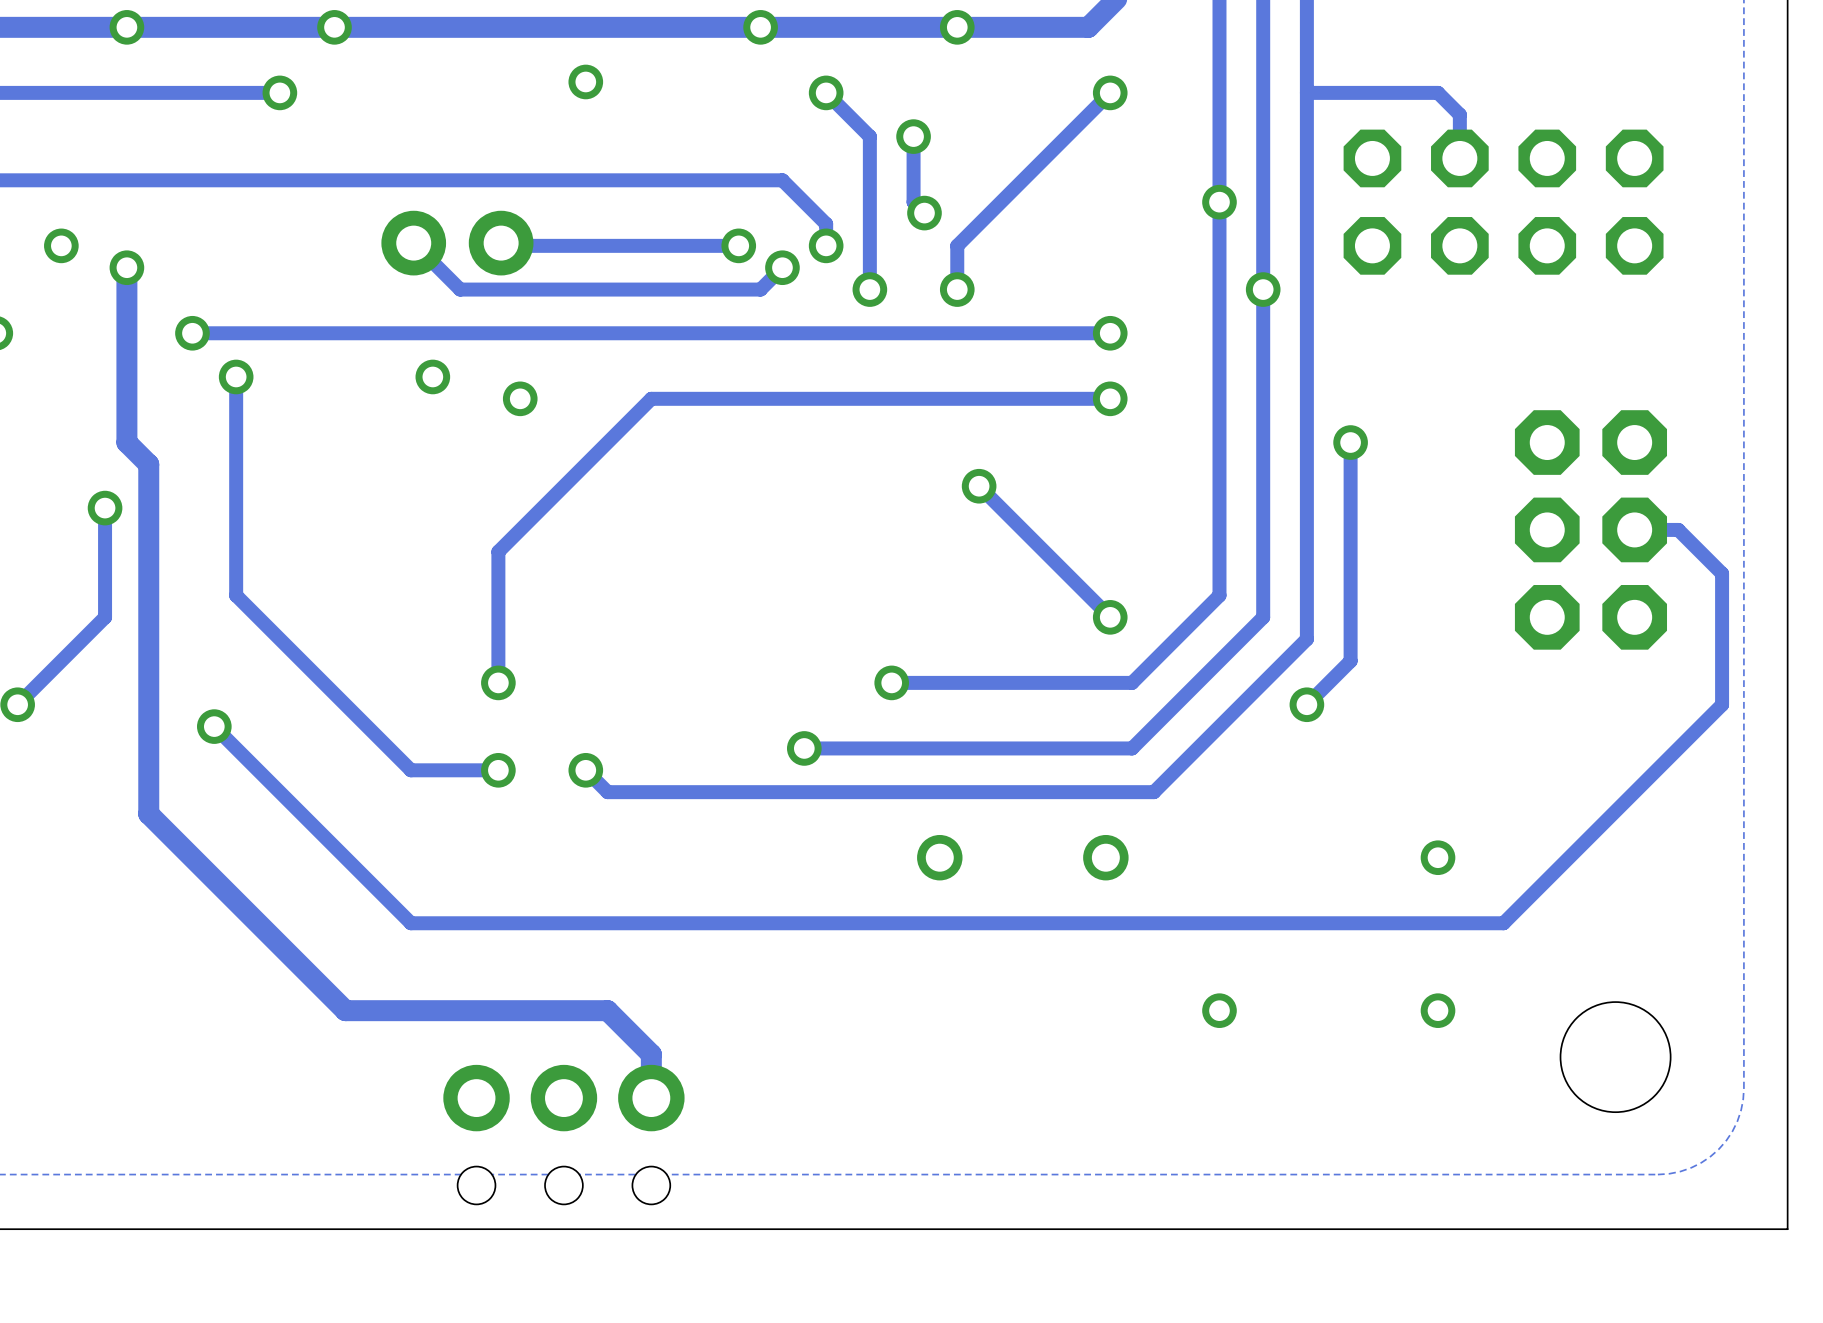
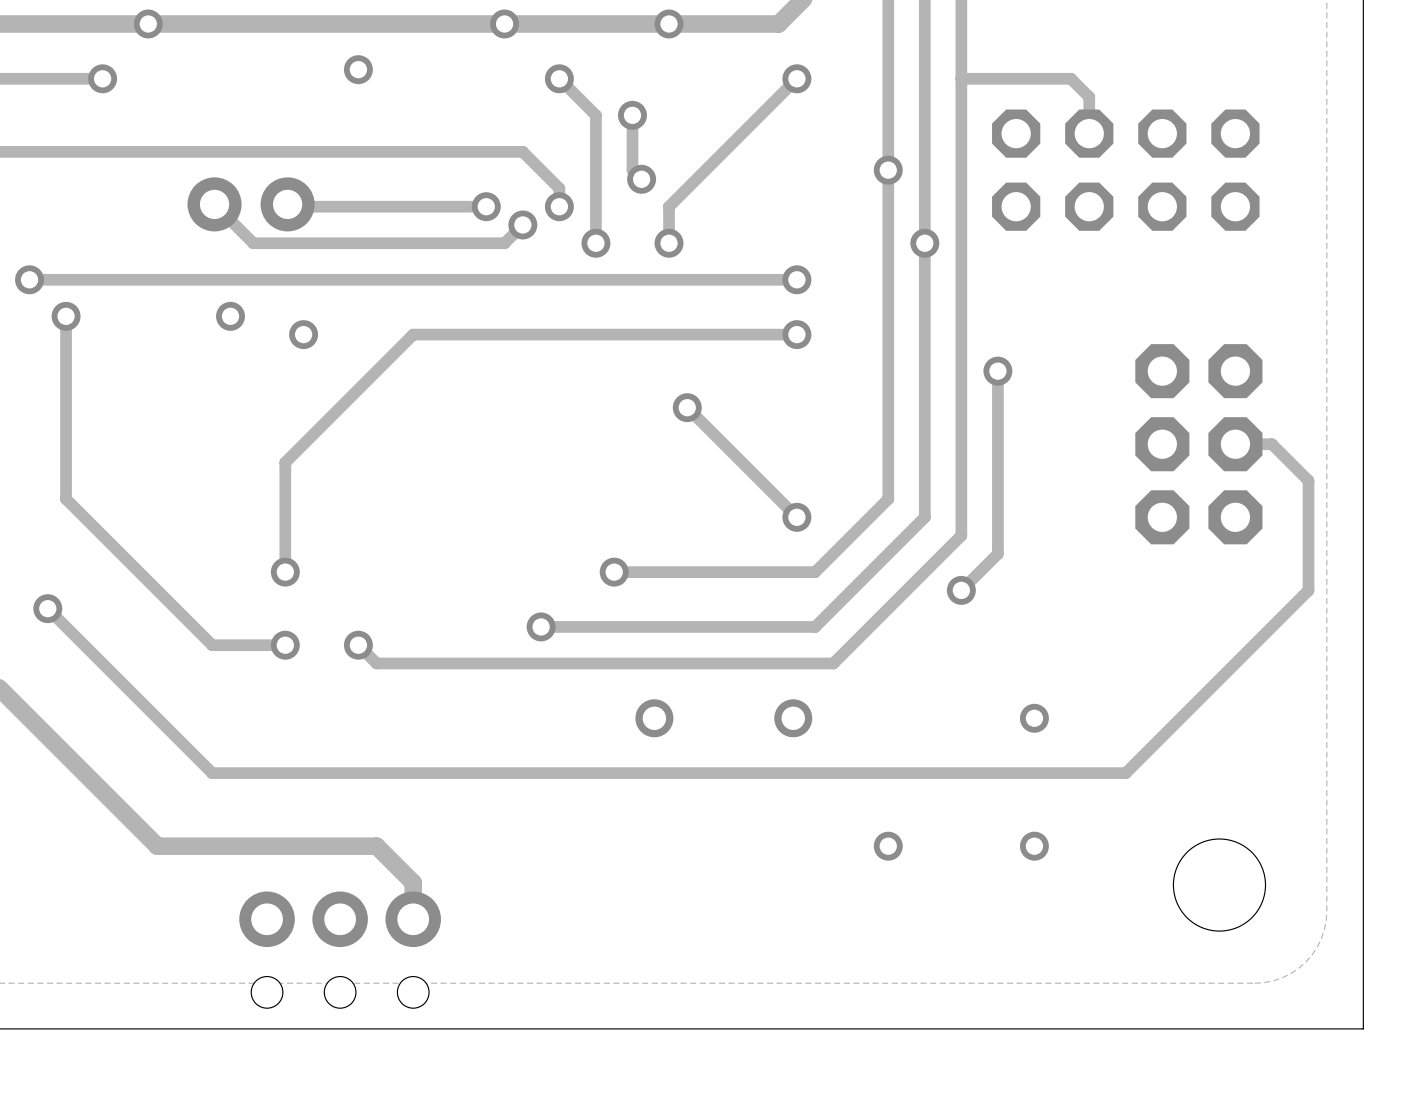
via position: (1438, 857) -> (1034, 718)
via position: (1438, 1010) -> (1034, 846)

